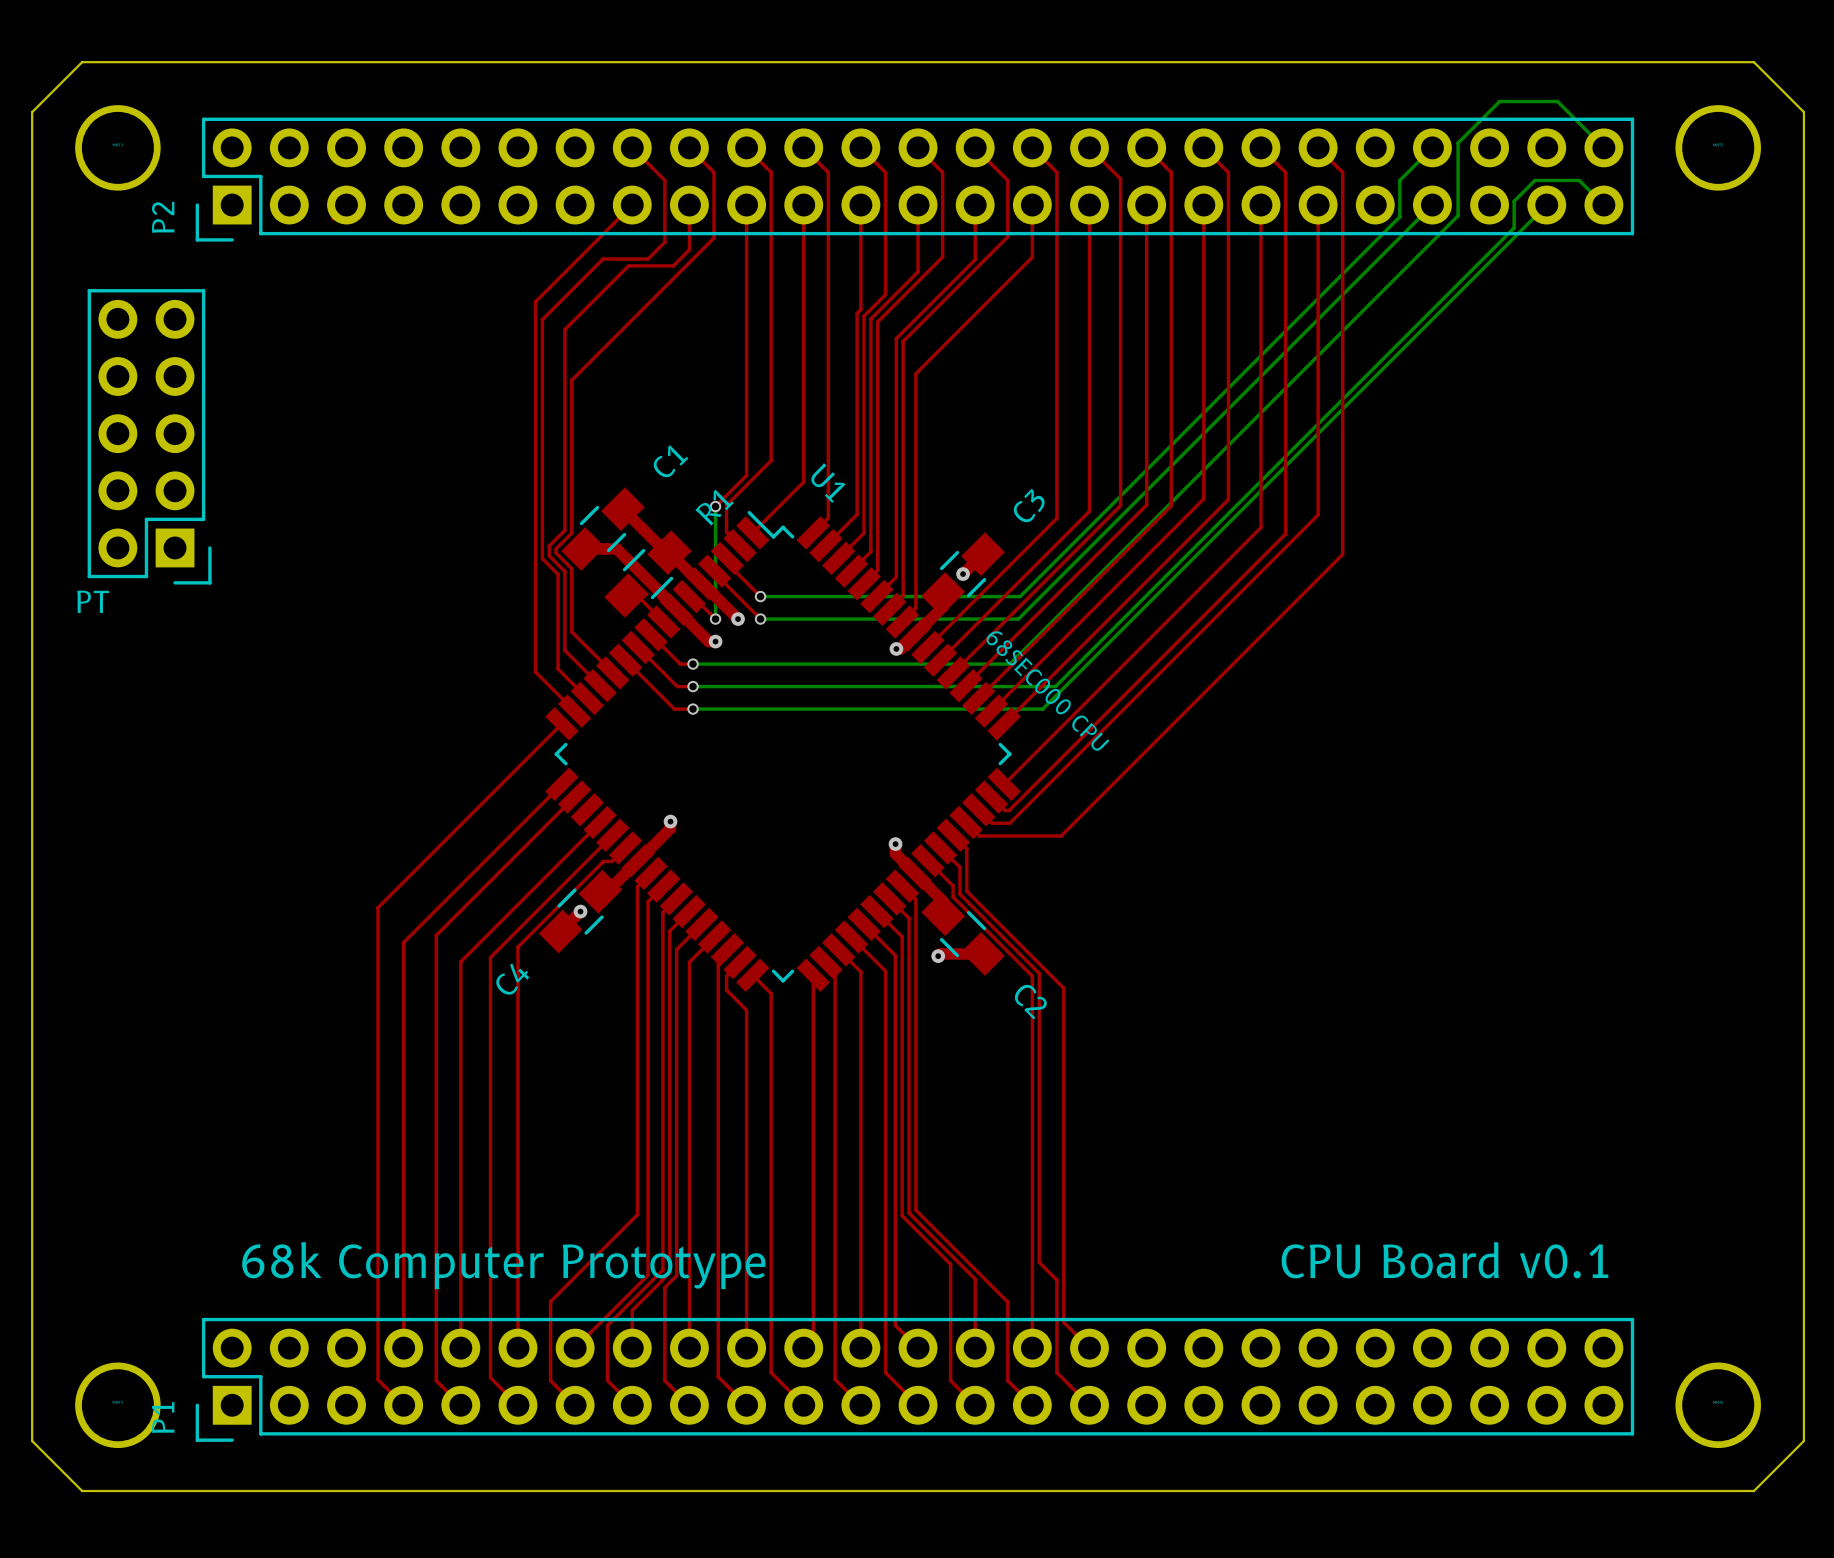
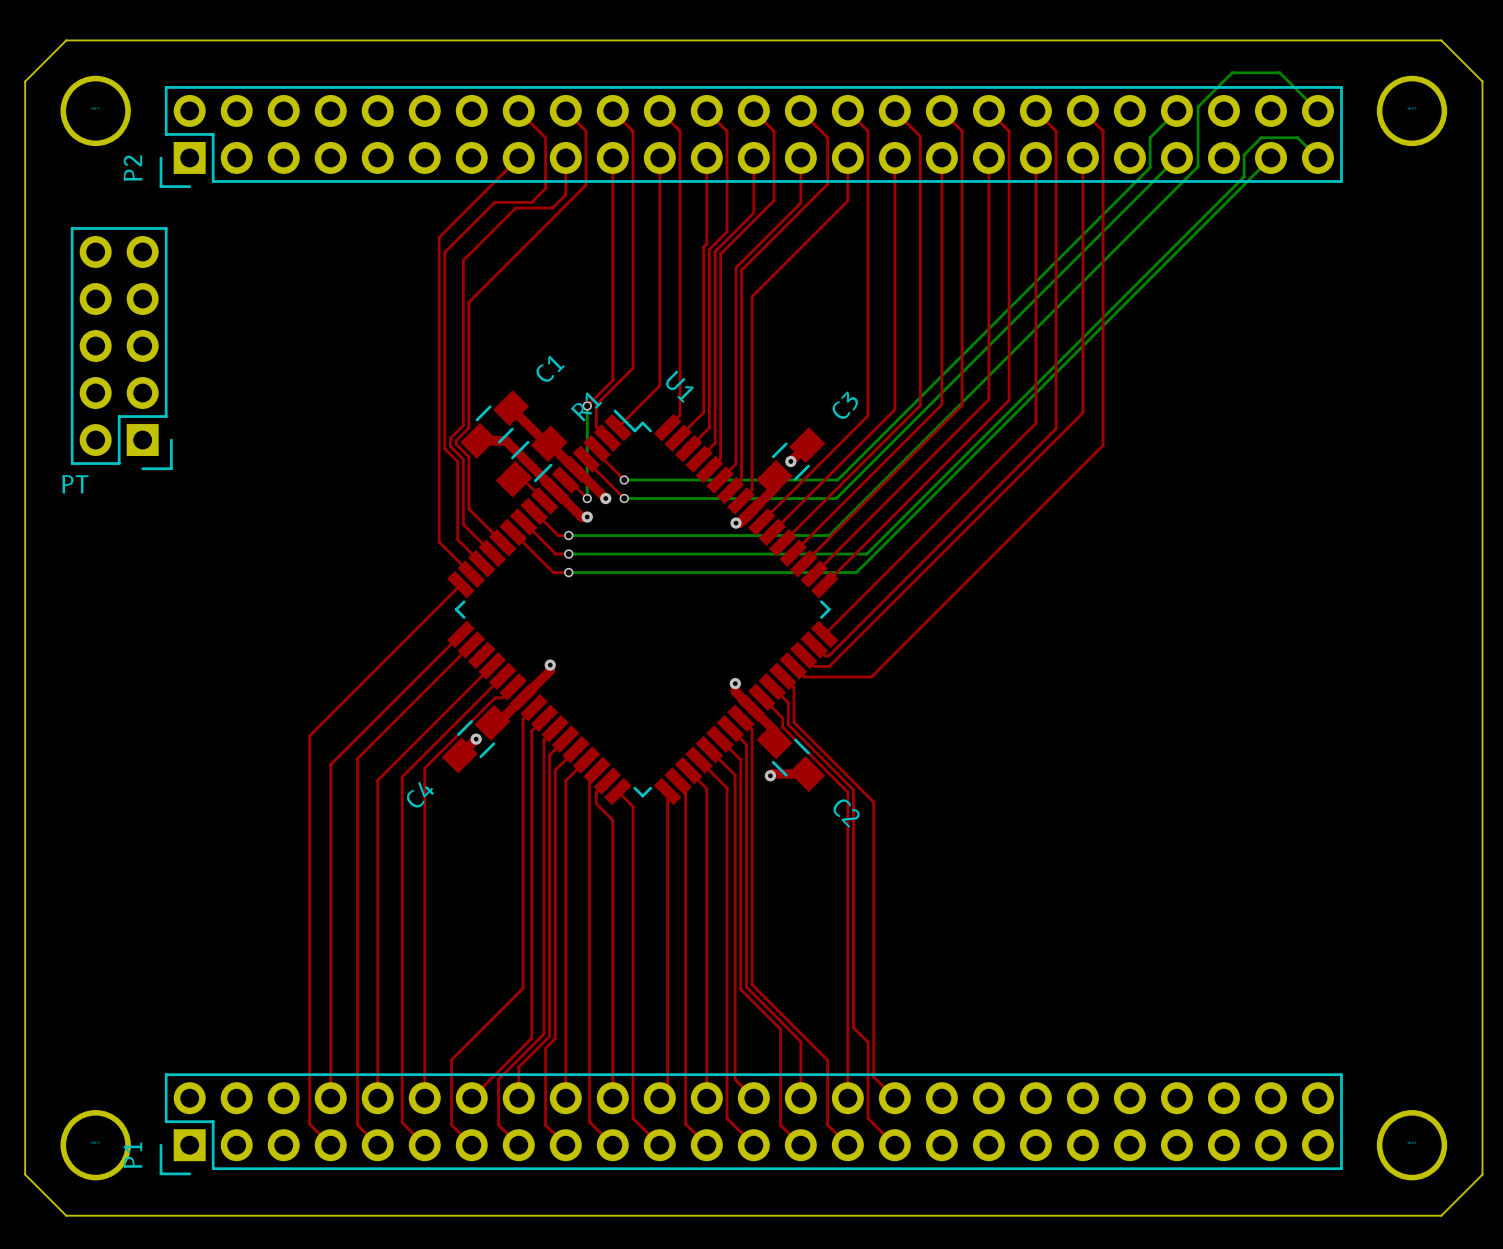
text: 68SEC000 CPU (1047, 690) -> none
text: CPU Board v0.1 (1444, 1260) -> none
text: 68k Computer Prototype (503, 1265) -> none

